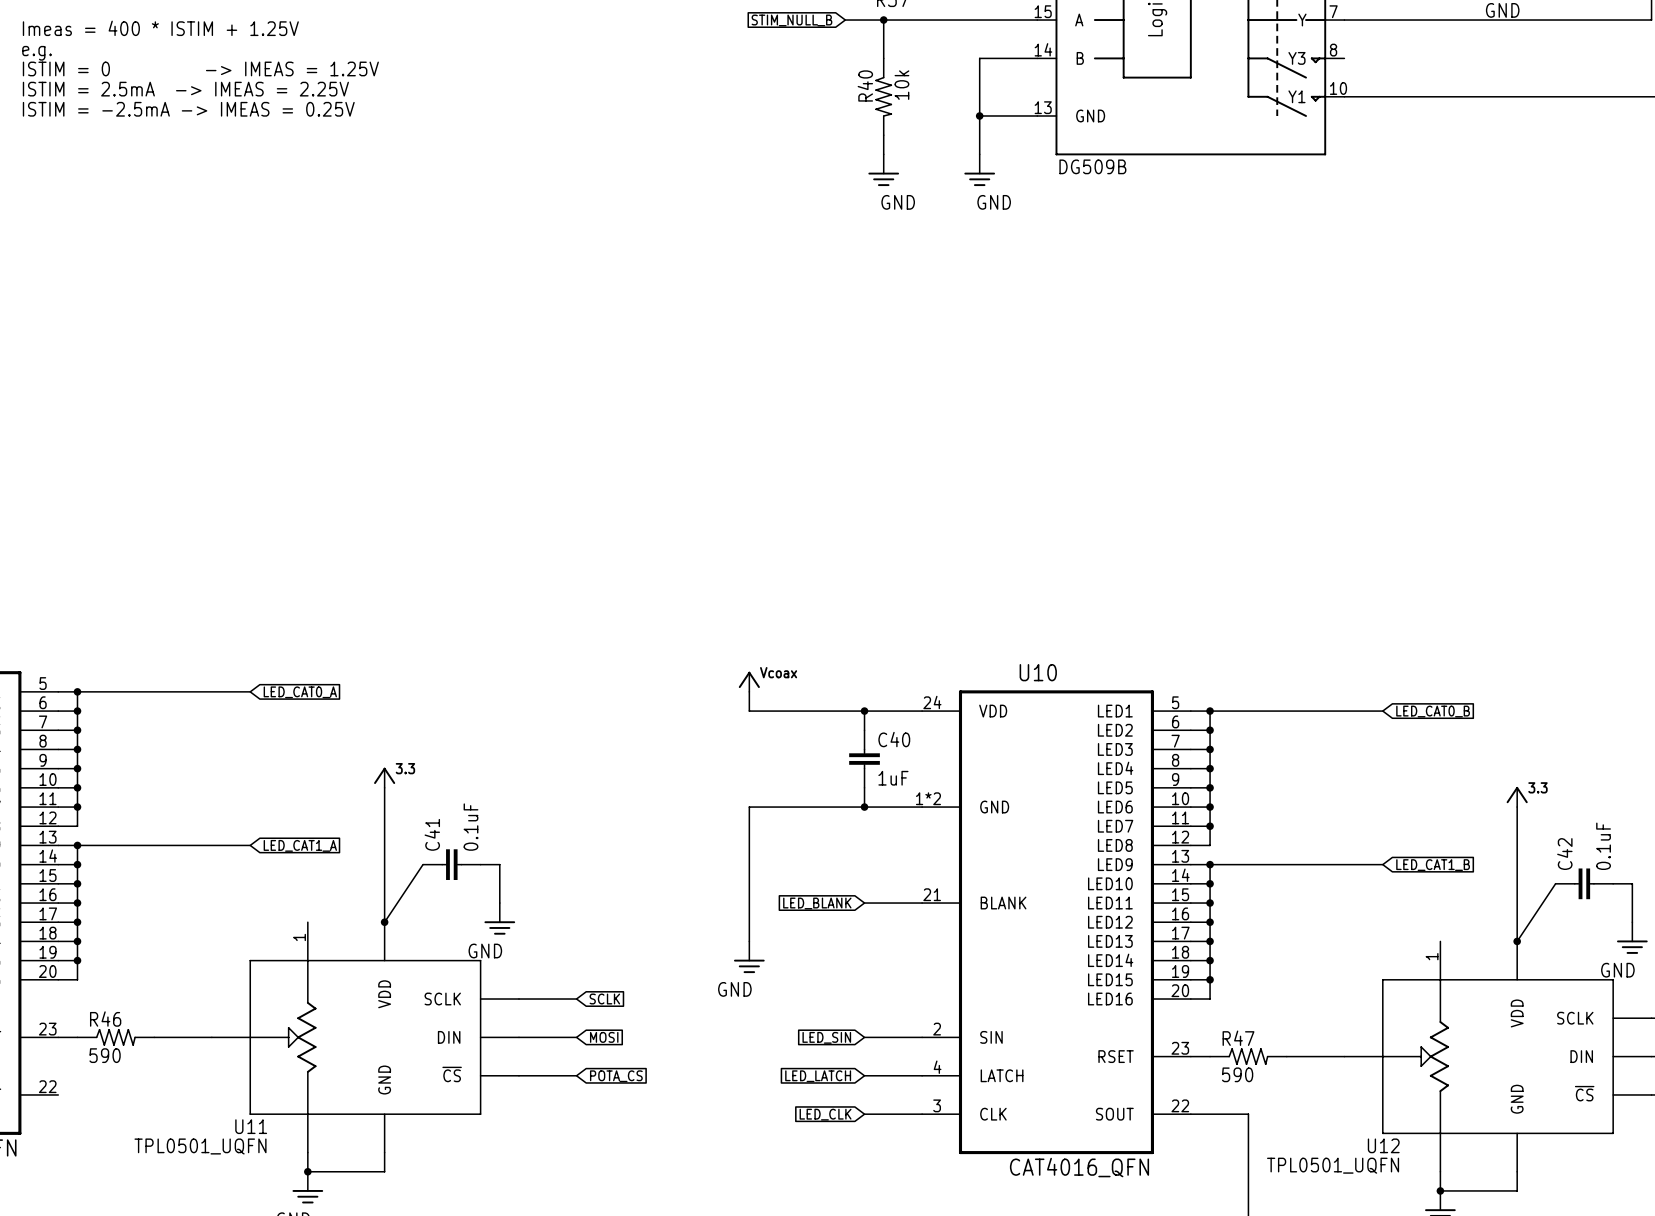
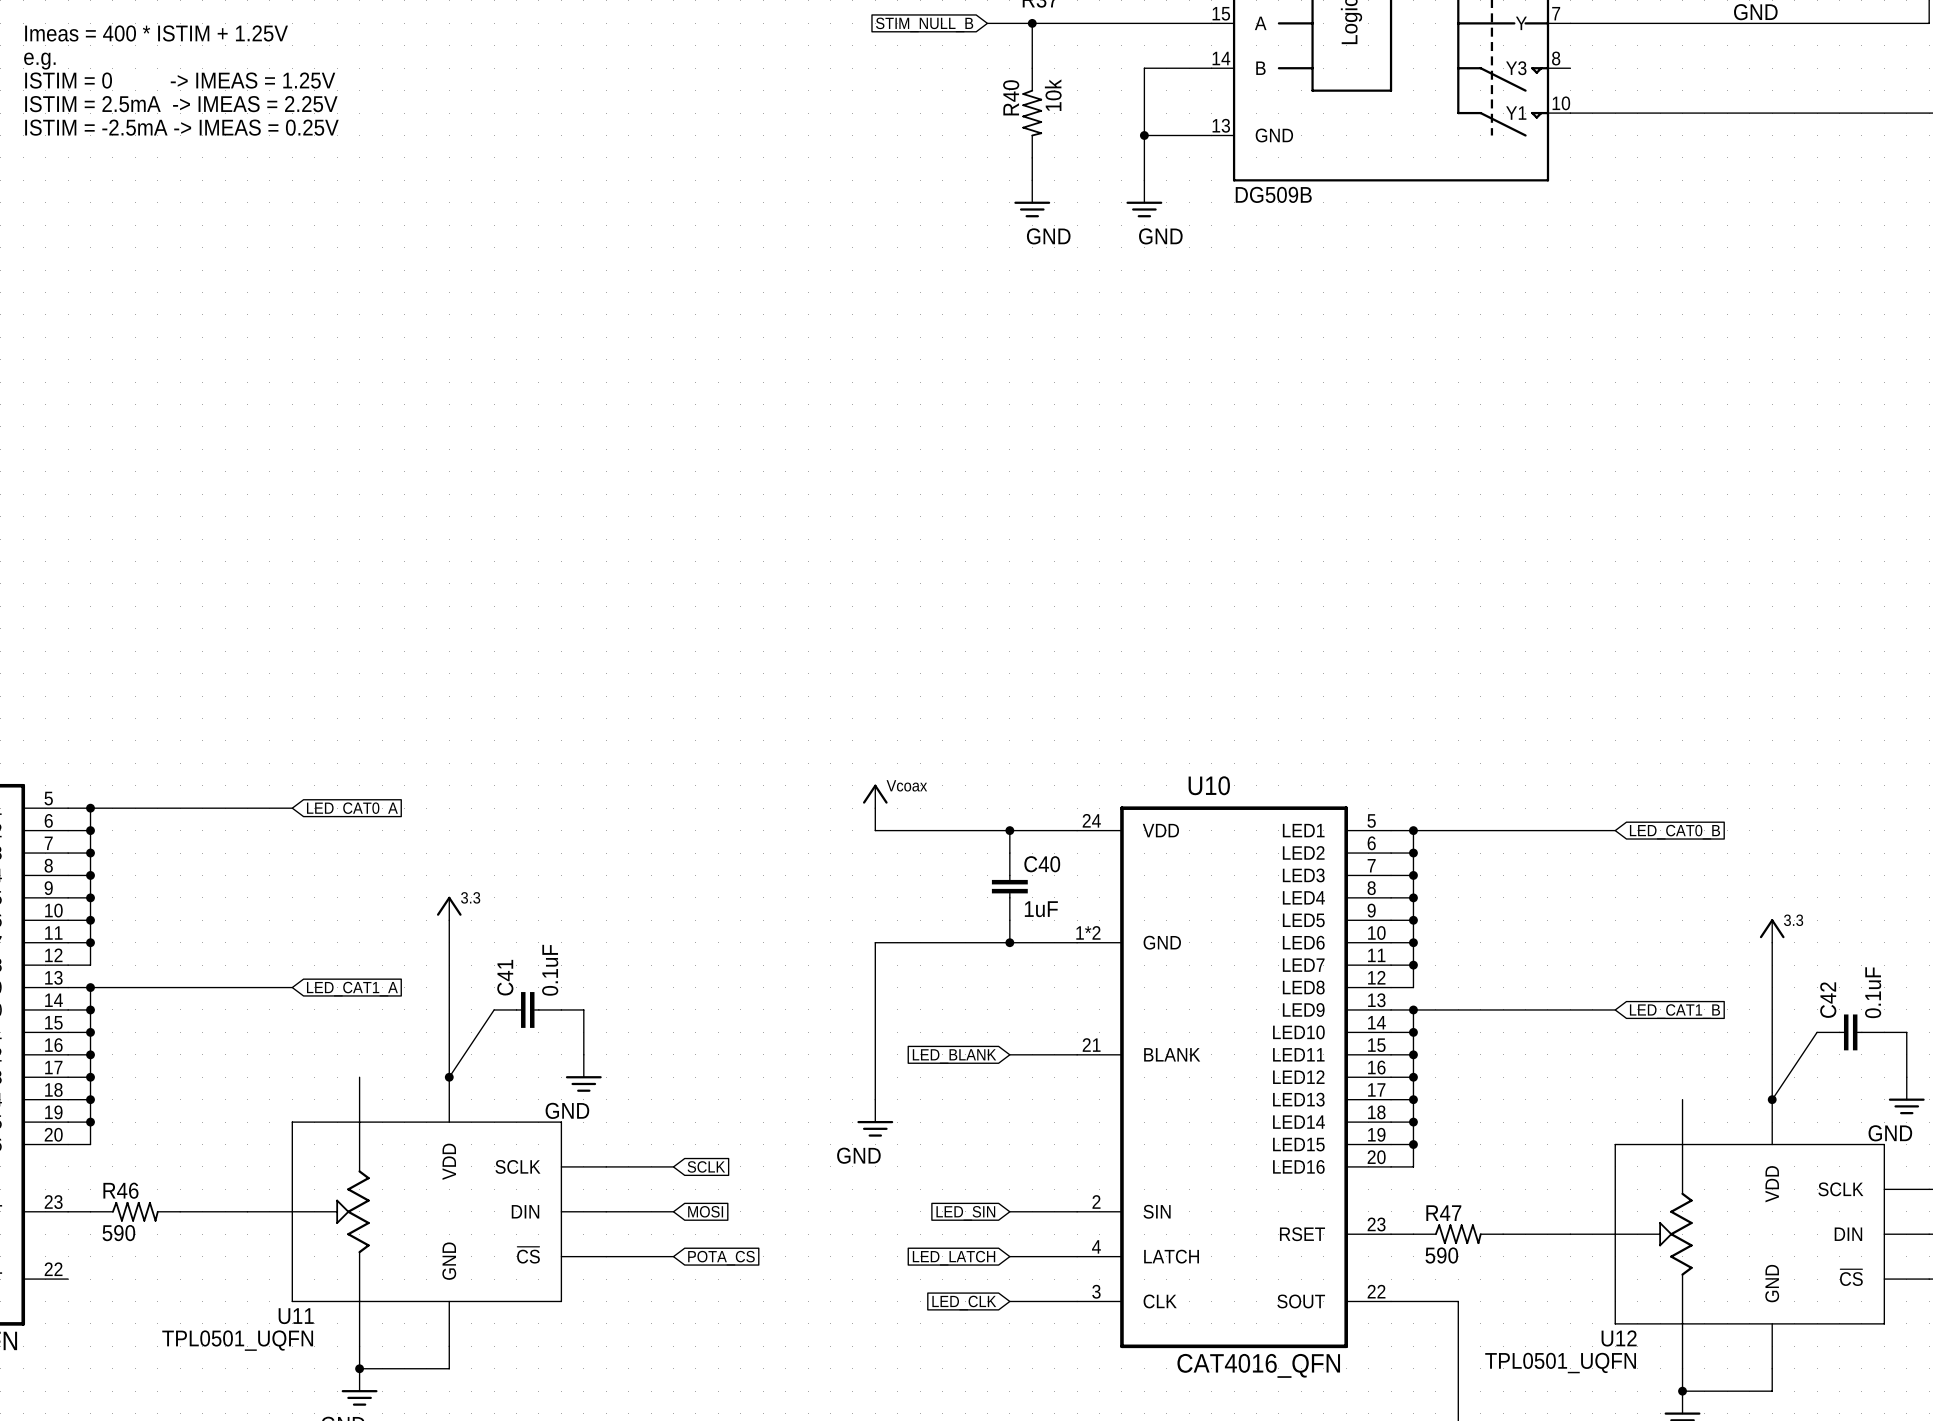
U11 pin number: 1 (299, 937) -> none
U12 pin number: 1 (1432, 956) -> none

